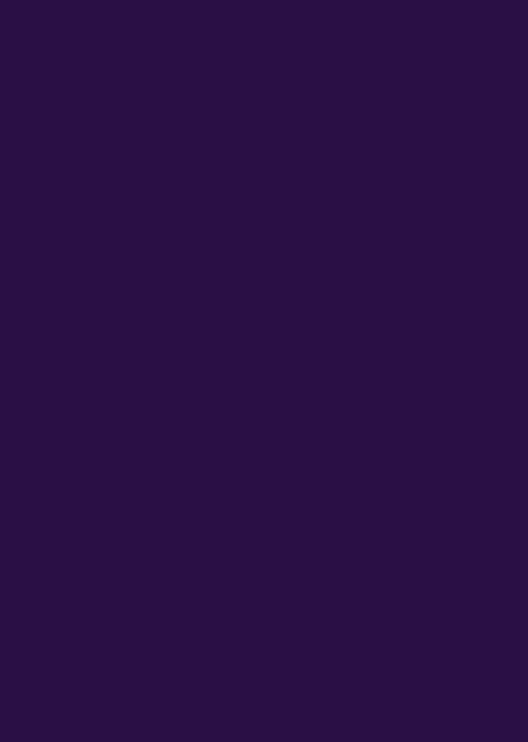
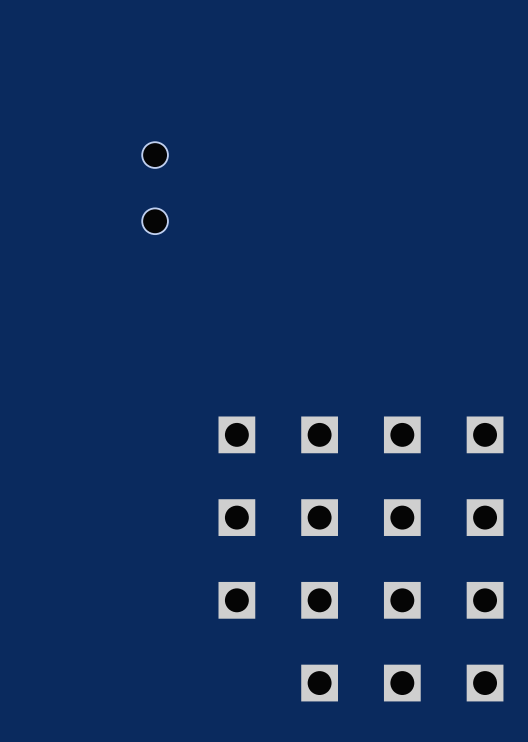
part: none -> (155, 188)
part: none -> (236, 434)
part: none -> (319, 434)
part: none -> (402, 434)
part: none -> (485, 434)
part: none -> (236, 517)
part: none -> (319, 517)
part: none -> (402, 517)
part: none -> (485, 517)
part: none -> (236, 600)
part: none -> (319, 600)
part: none -> (402, 600)
part: none -> (485, 600)
part: none -> (319, 683)
part: none -> (402, 683)
part: none -> (485, 683)

